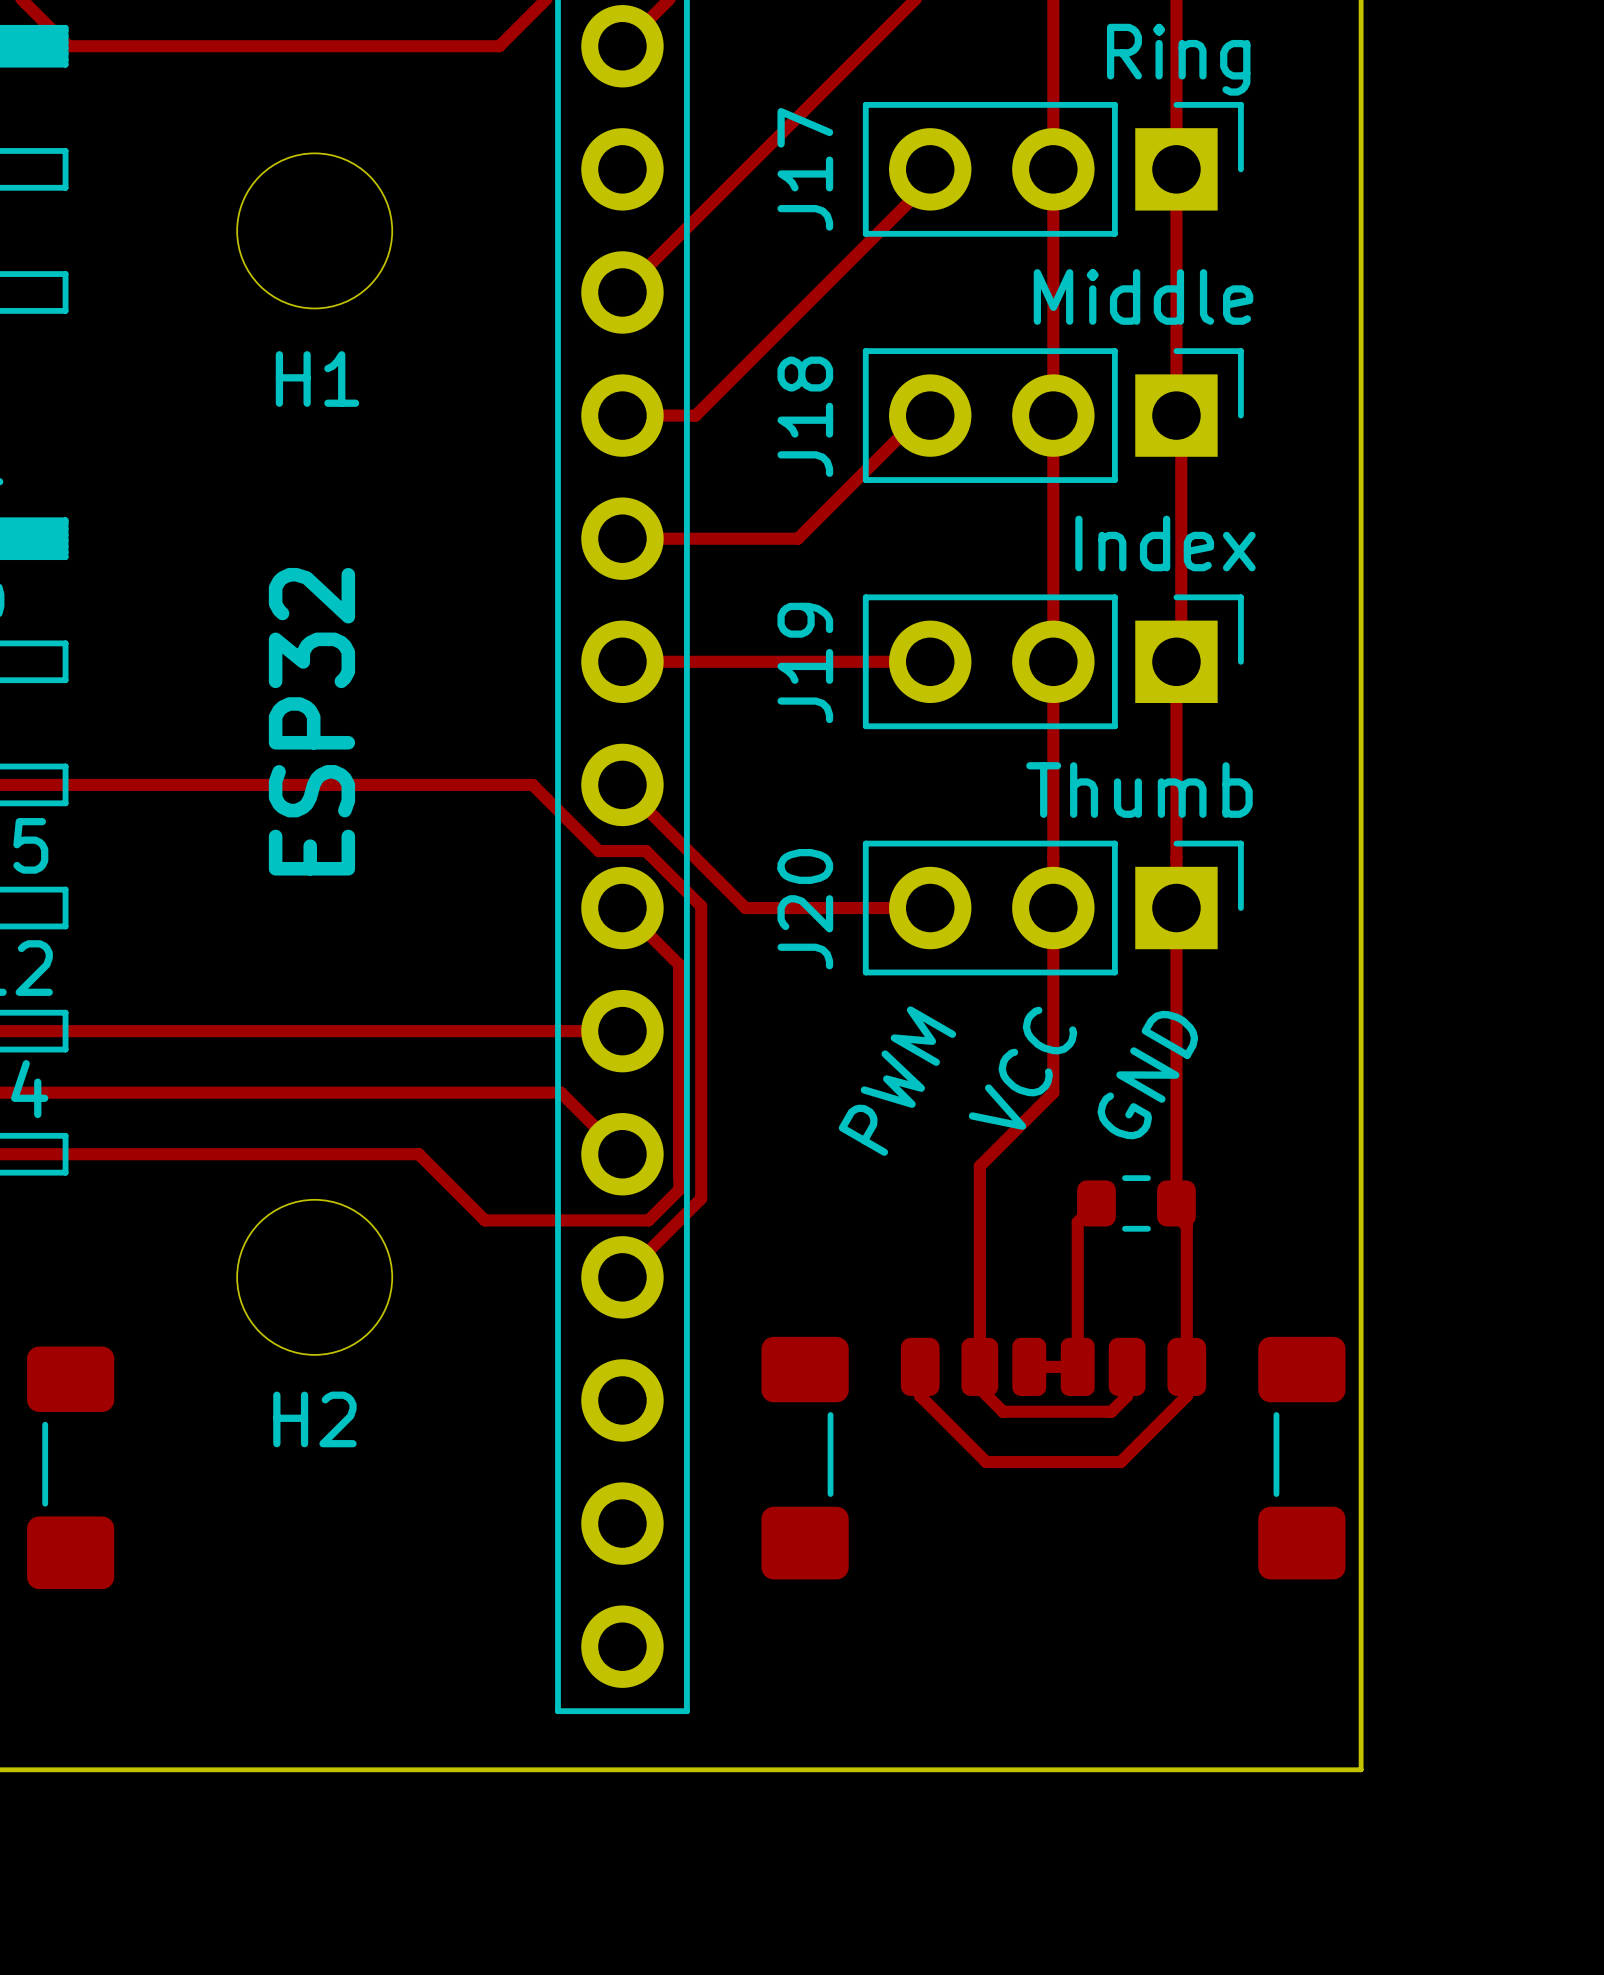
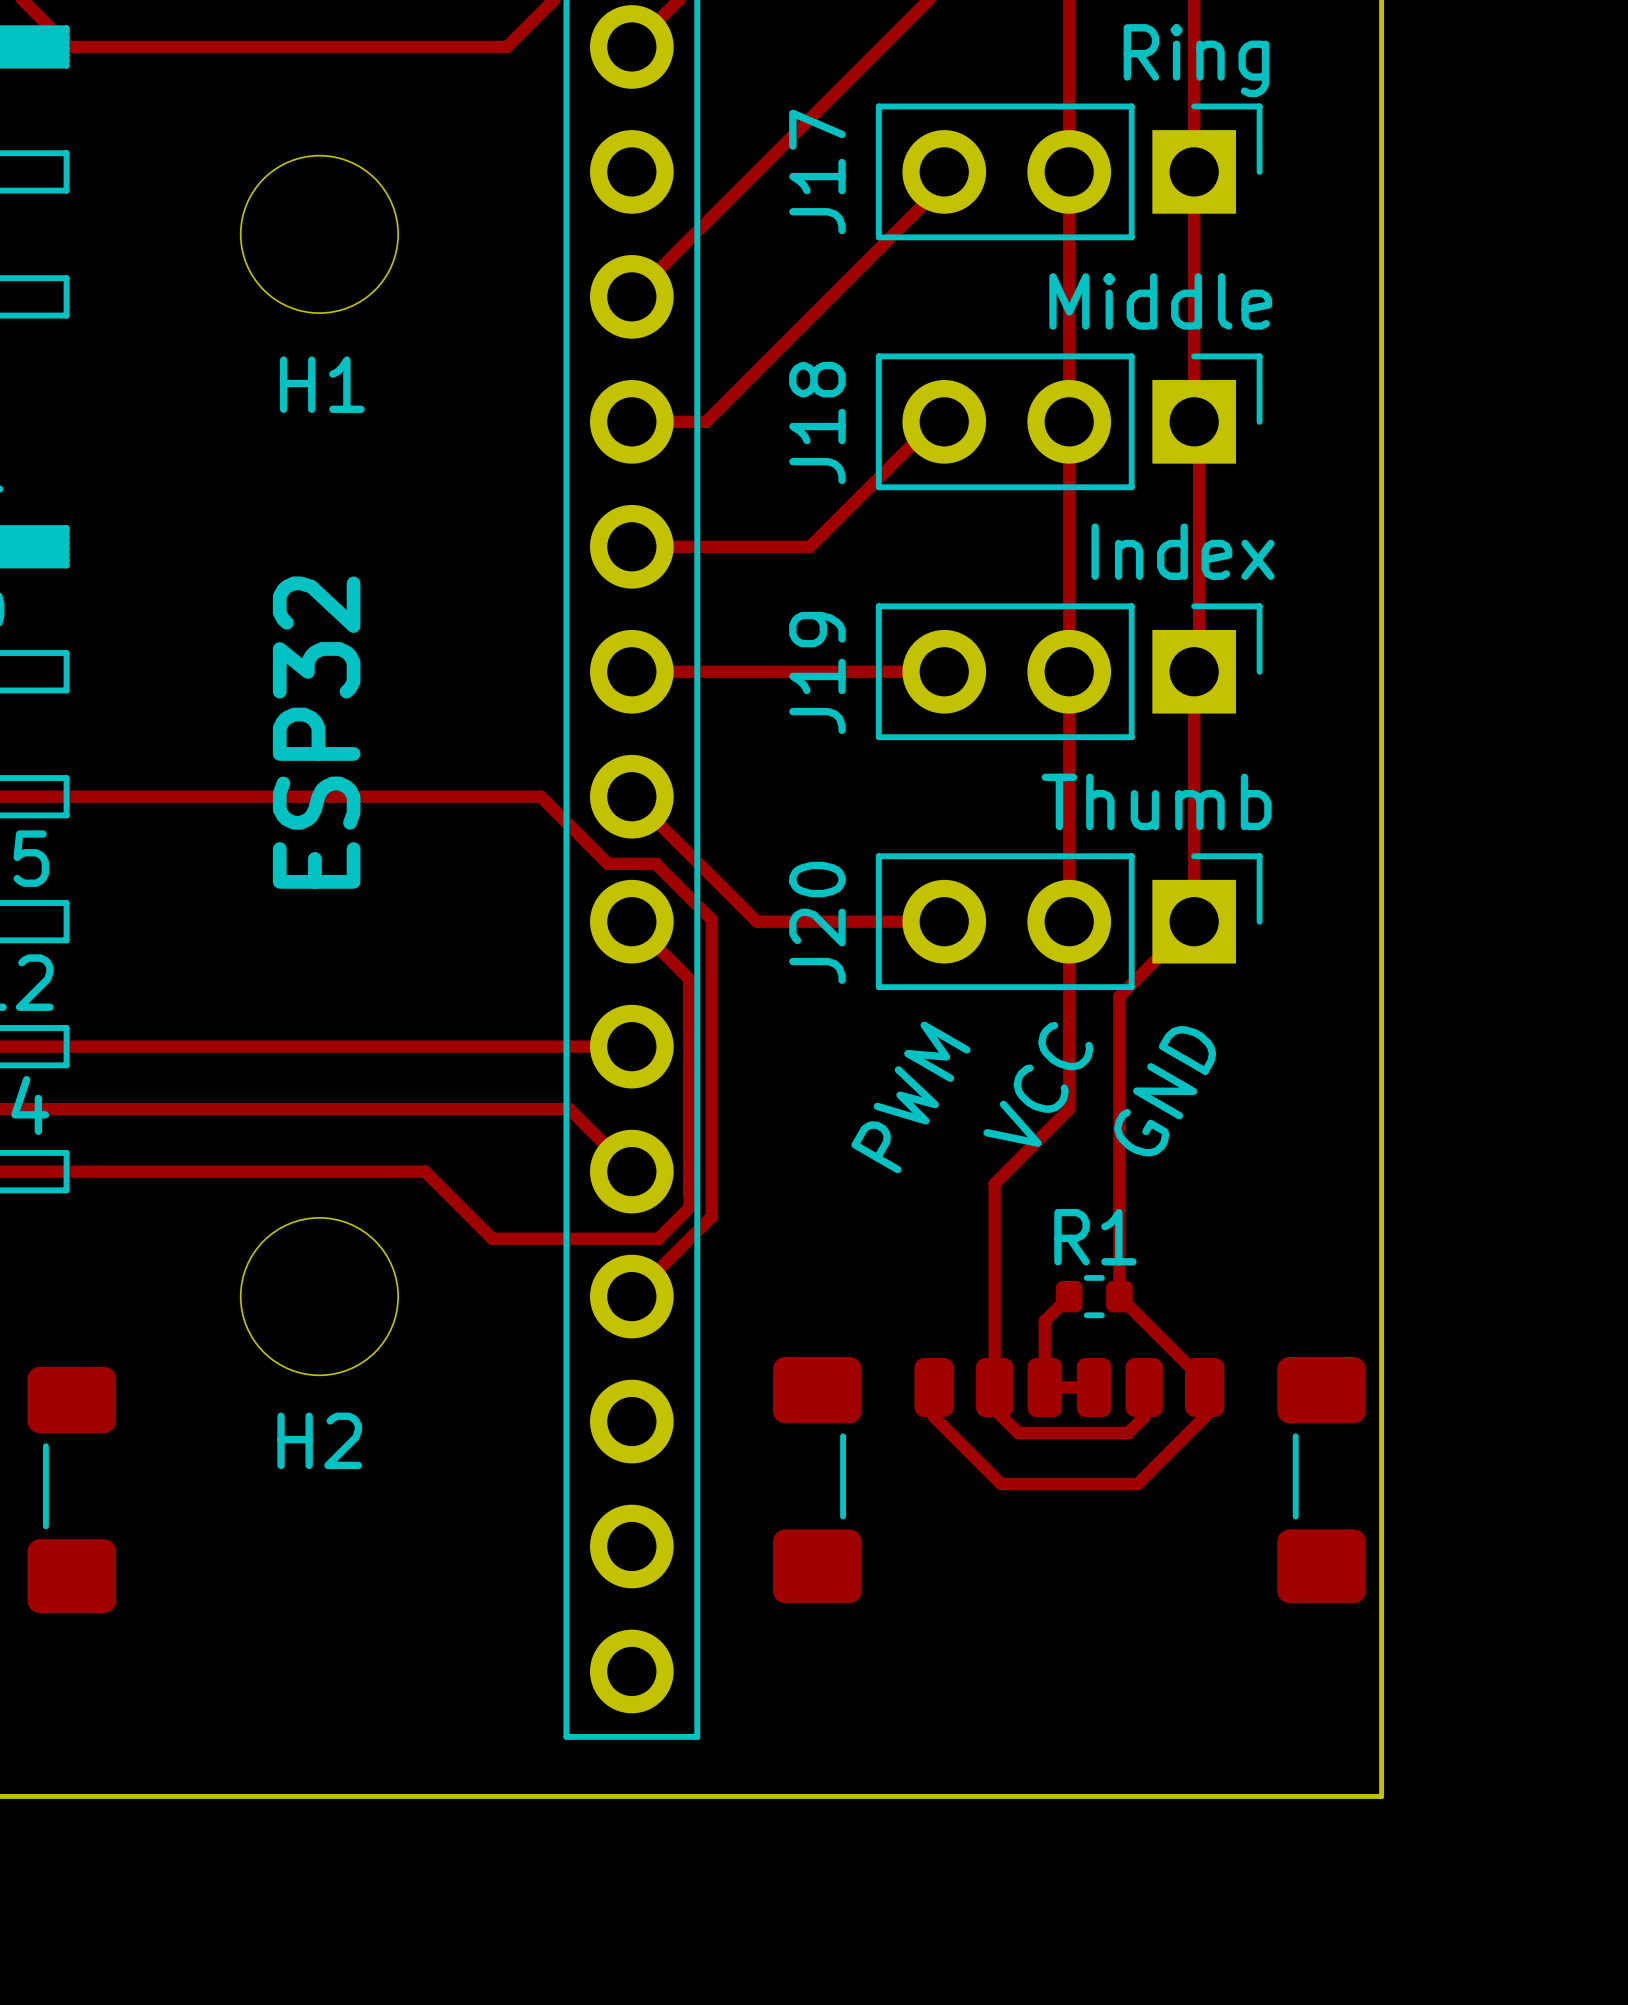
track: (1176, 908) (1176, 1215) (1186, 1226) (1186, 1361) -> (1194, 921) (1119, 996) (1119, 1296) (1204, 1381)
track: (1096, 1203) (1077, 1222) (1077, 1366) -> none
part: (1136, 1203) -> none
track: none -> (1069, 1296) (1044, 1321) (1044, 1387)
R1: none -> (1094, 1296)

